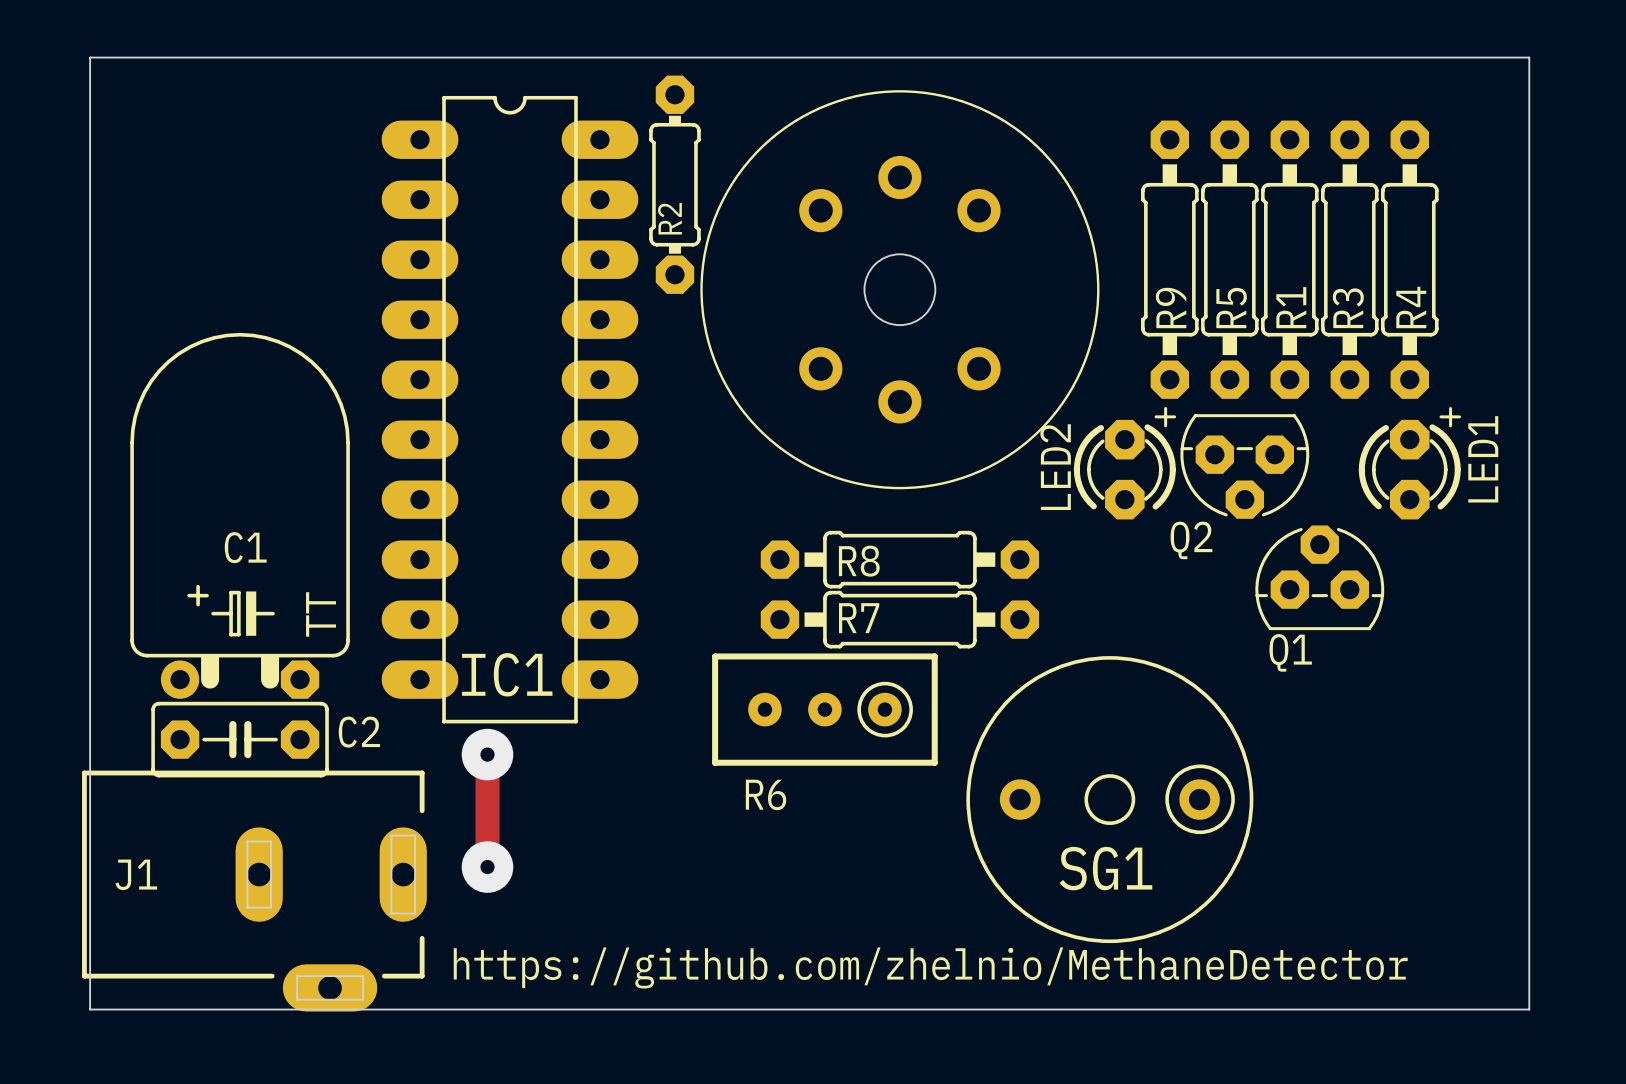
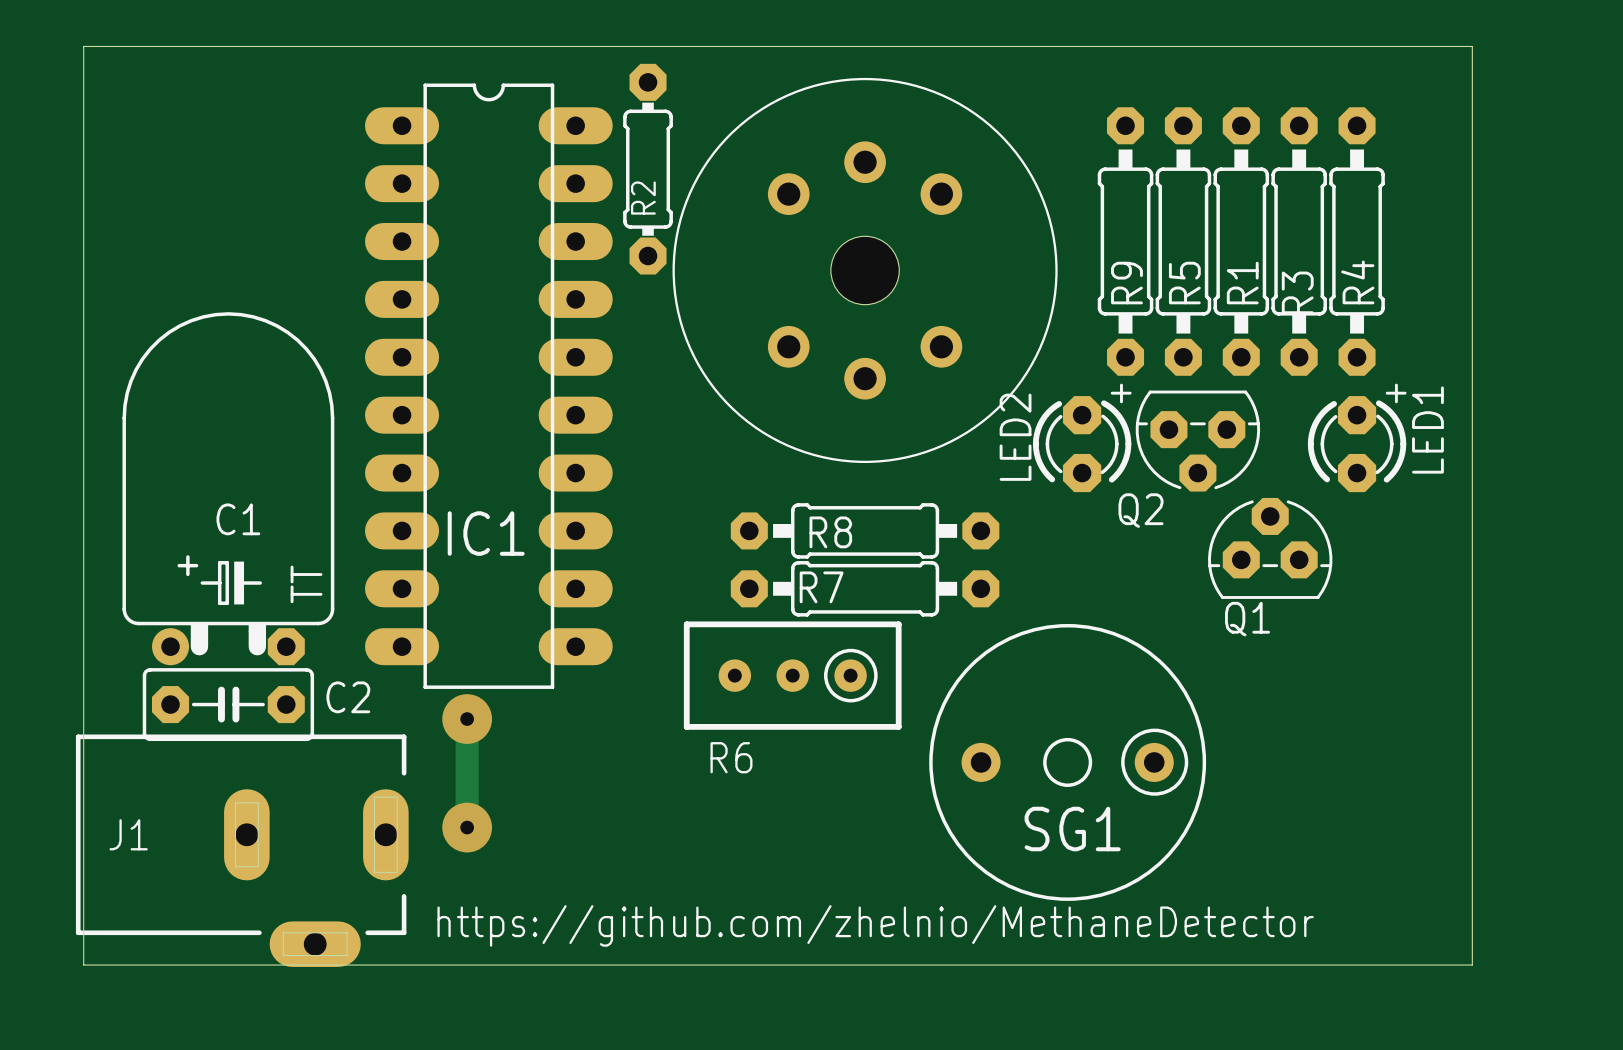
IC1 name position: IC1 (507, 674) -> IC1 (486, 533)

